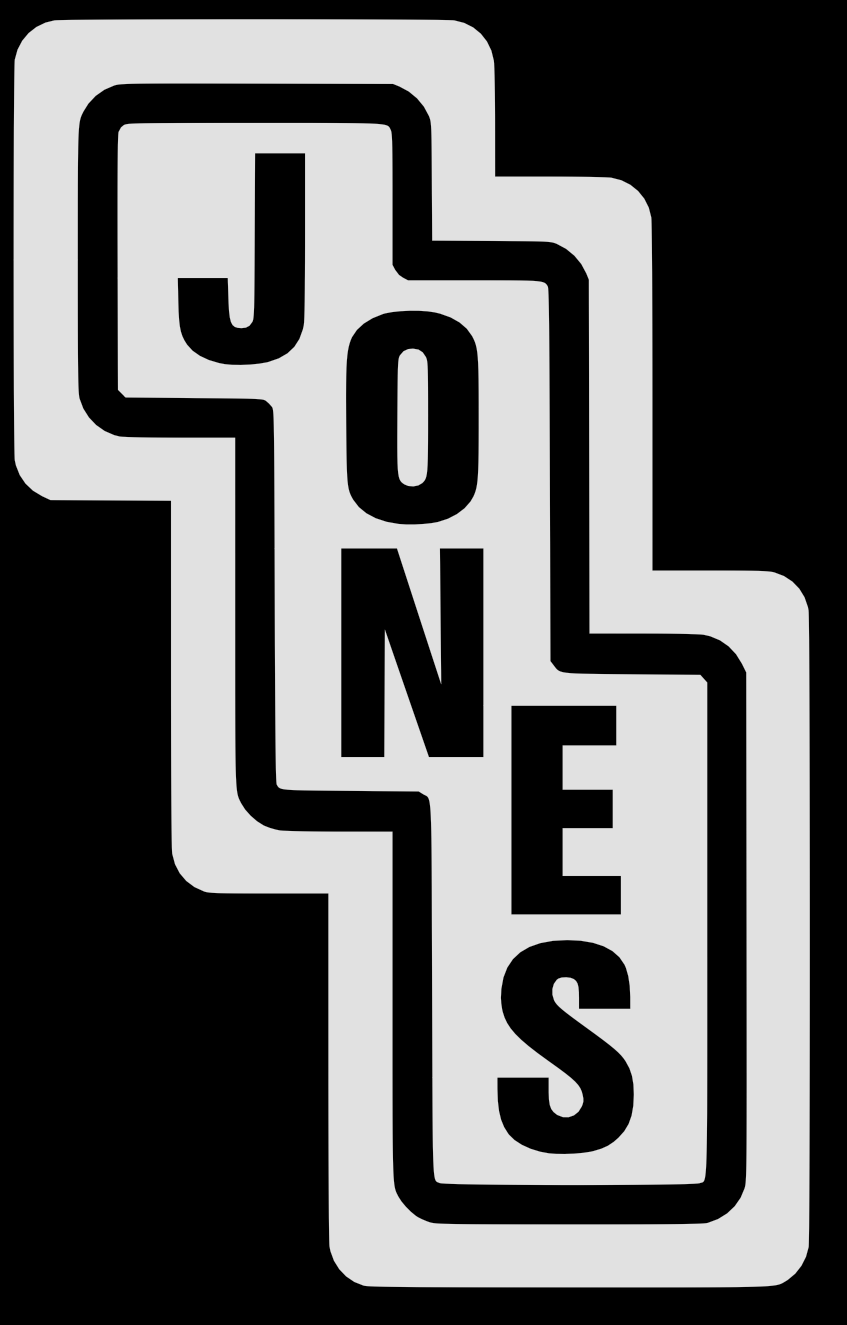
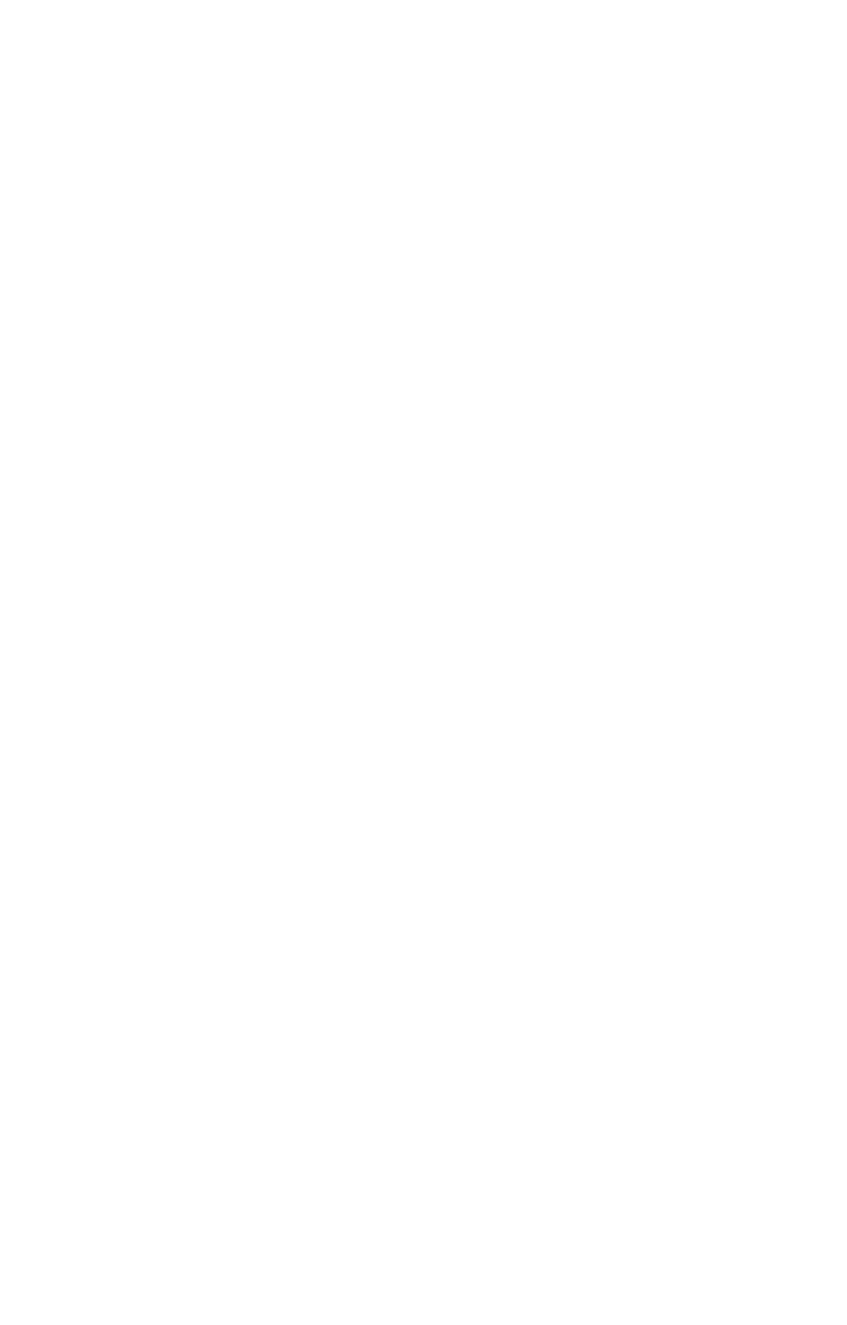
drawing: [13, 19, 810, 1288] -> none

